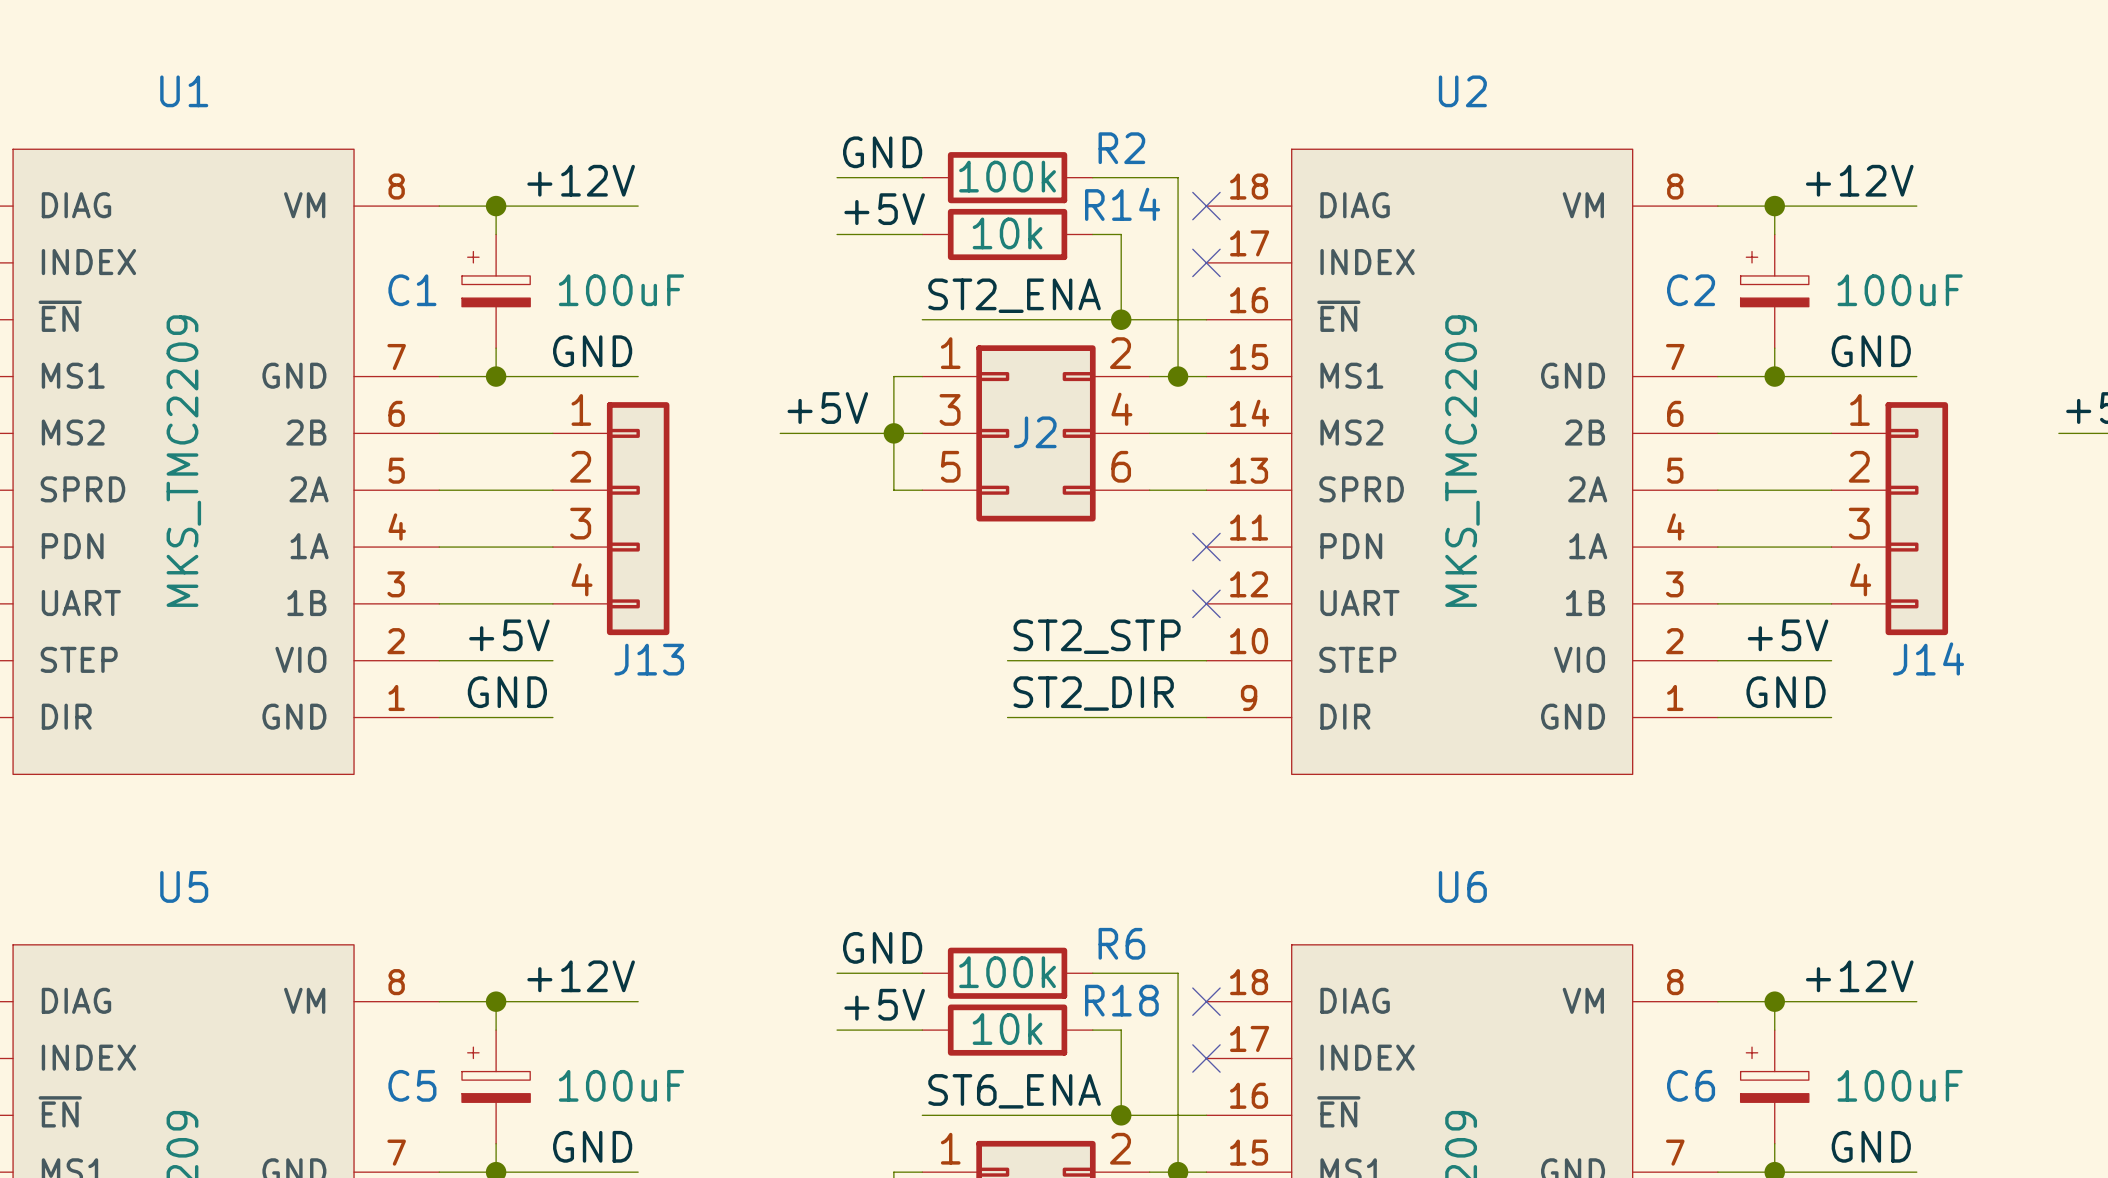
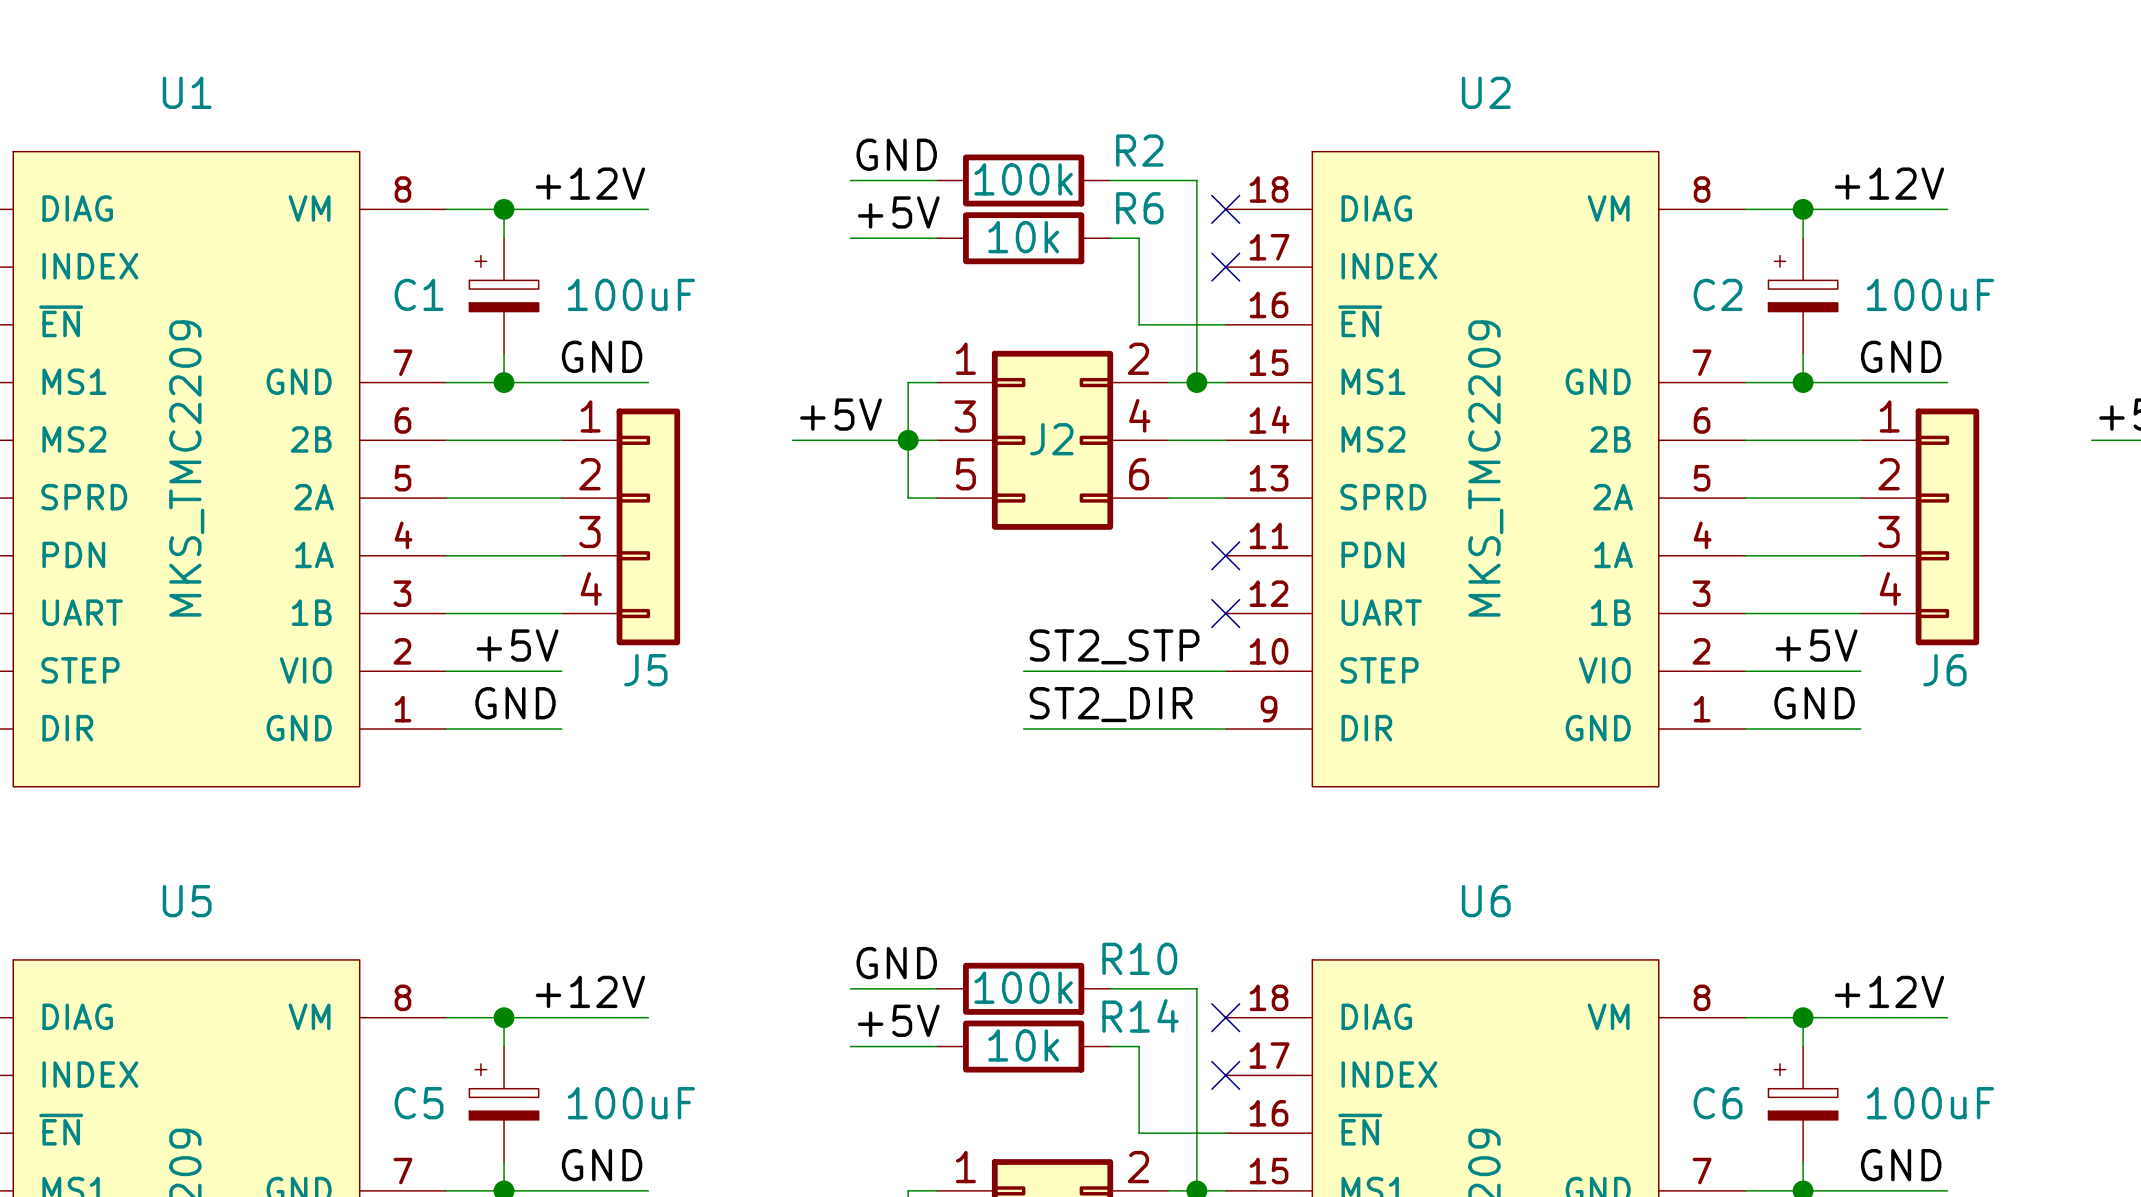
R14 name: R14 (1122, 204) -> R6 (1139, 208)
label: ST2_ENA (1014, 295) -> none
wire: (922, 319) (1121, 319) -> none
junction: (1121, 319) -> none
J14 name: J14 (1928, 658) -> J6 (1944, 670)
J13 name: J13 (649, 659) -> J5 (645, 670)
R6 name: R6 (1121, 943) -> R10 (1139, 958)
R18 name: R18 (1121, 1000) -> R14 (1140, 1015)
label: ST6_ENA (1014, 1091) -> none
wire: (922, 1115) (1121, 1115) -> none
junction: (1121, 1115) -> none

